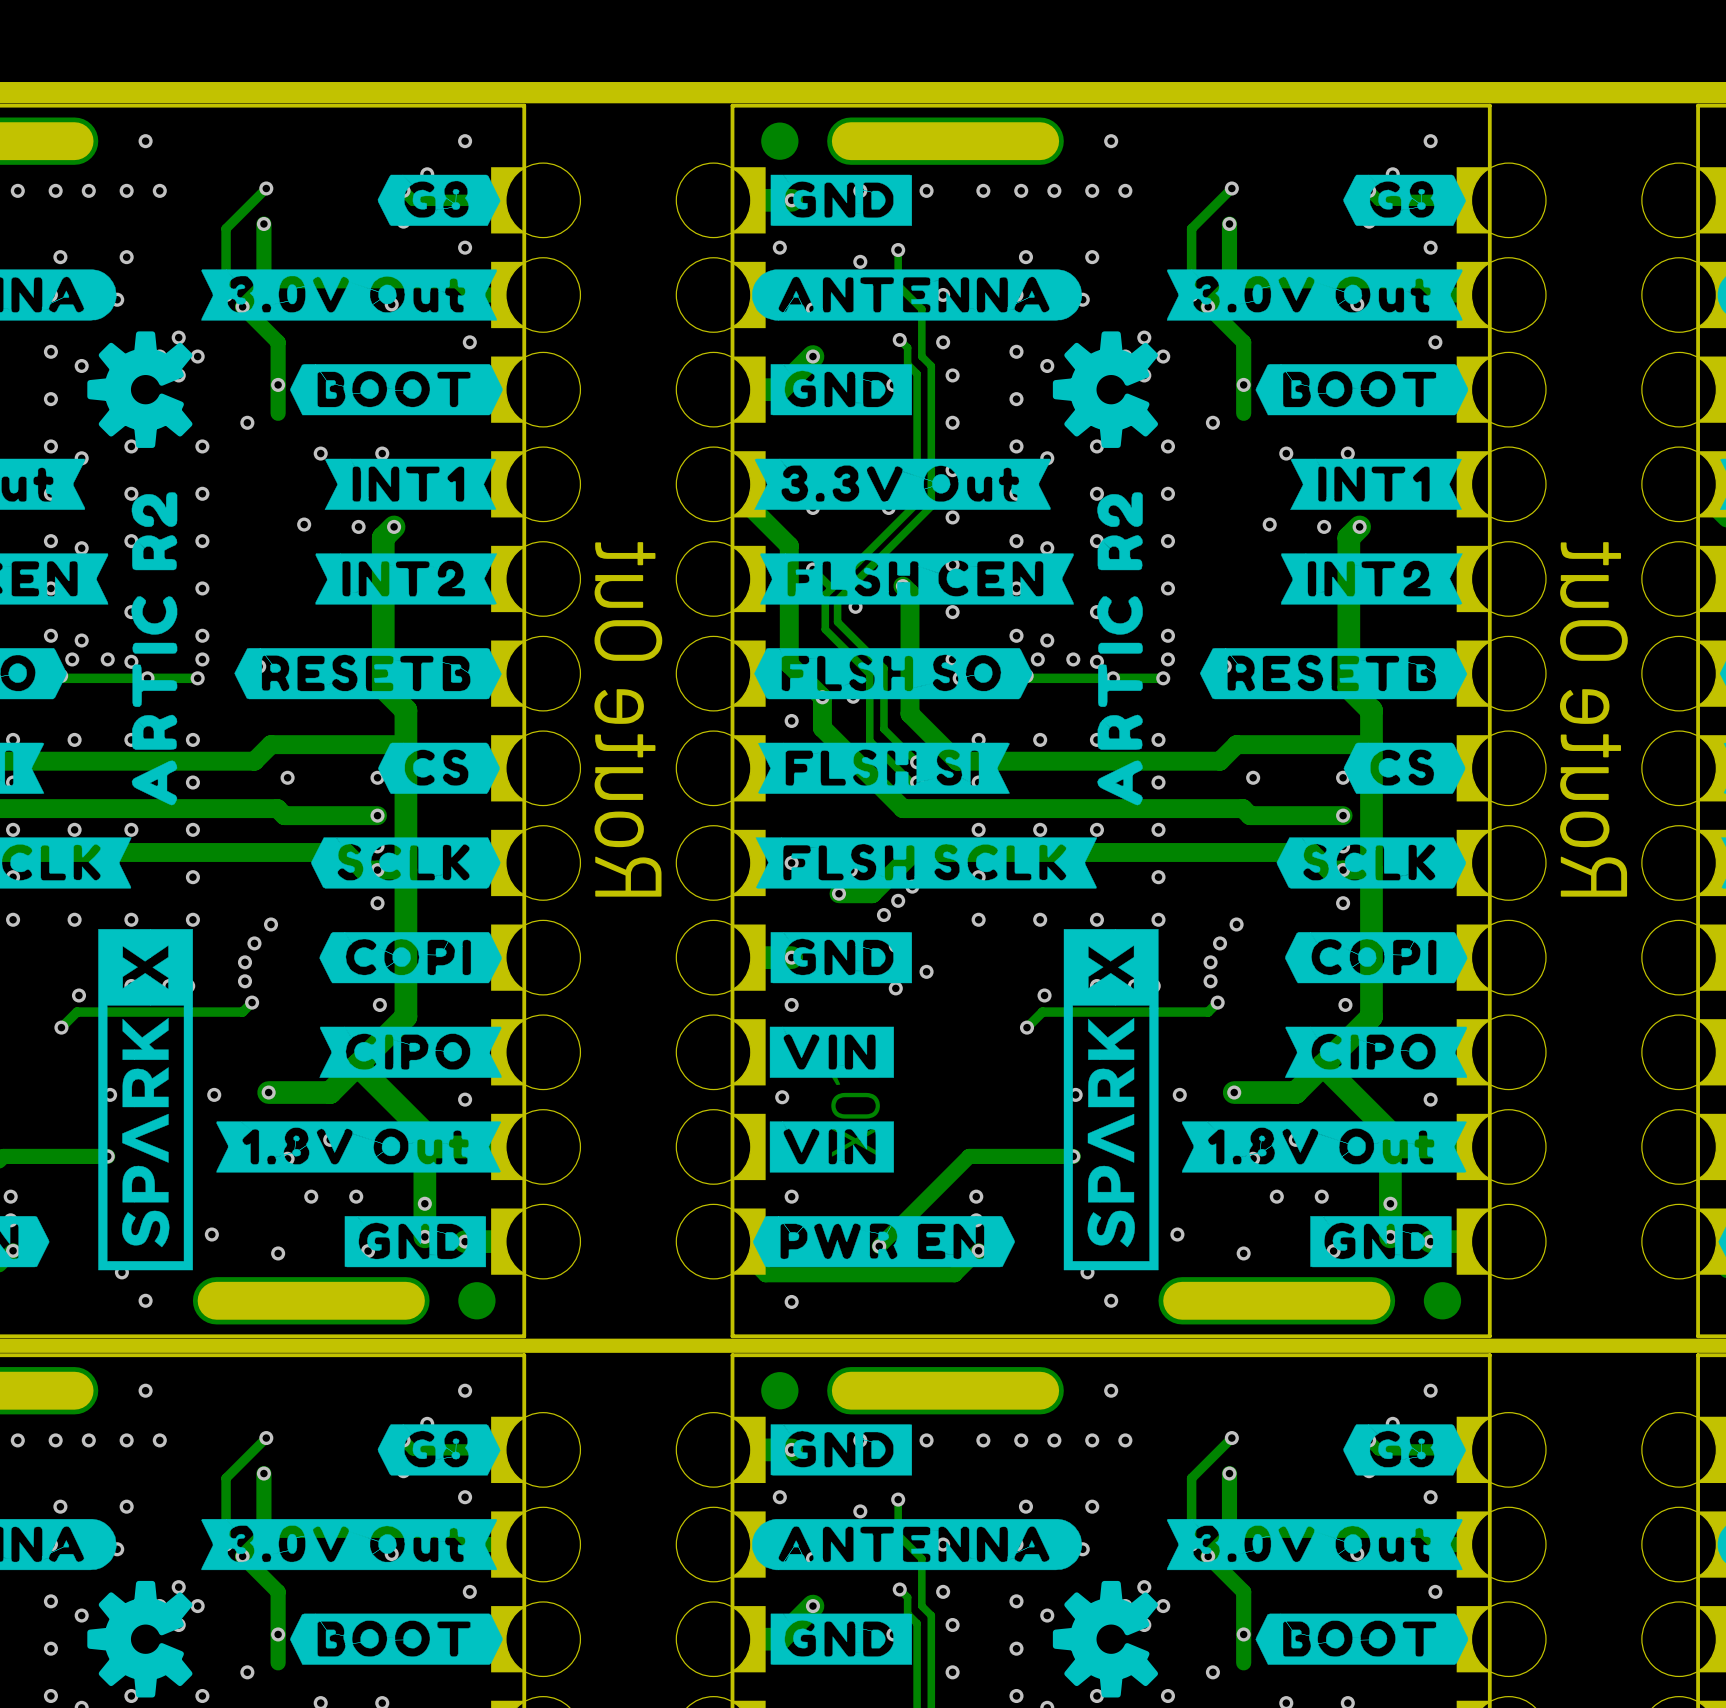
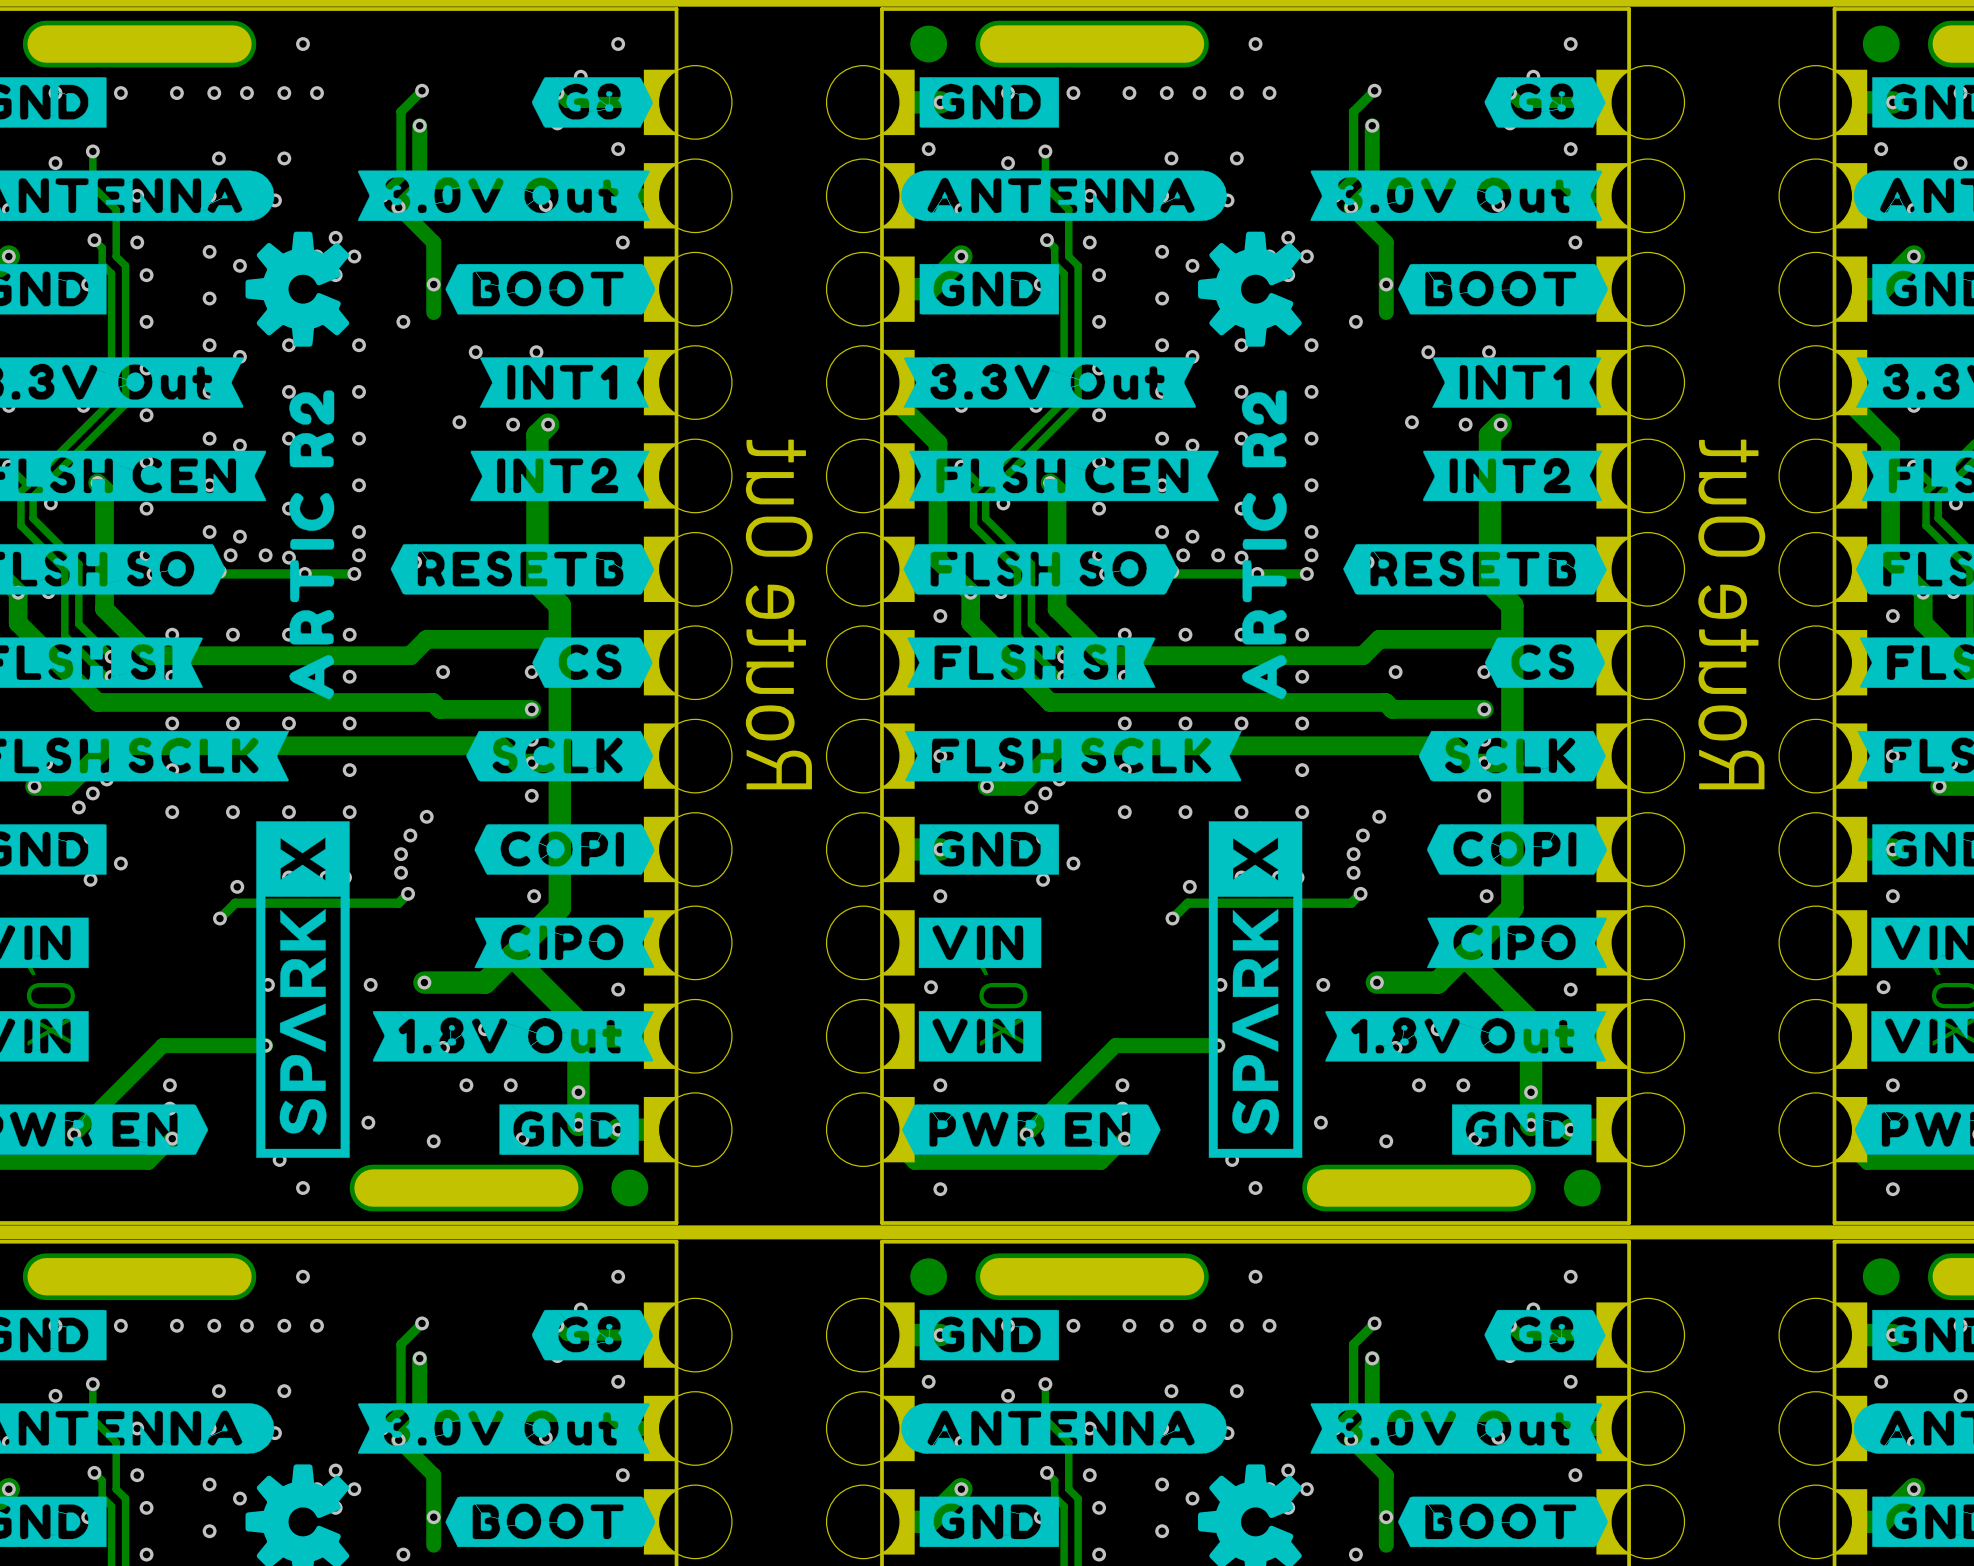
track: (244, 209) (226, 228) (226, 294) -> (401, 111) (401, 177) (382, 195)
track: (1210, 209) (1191, 228) (1191, 294) -> (1353, 111) (1353, 177) (1334, 195)
track: (244, 1459) (226, 1478) (226, 1544) -> (401, 1344) (401, 1409) (382, 1428)
track: (1210, 1459) (1191, 1478) (1191, 1544) -> (1353, 1344) (1353, 1409) (1334, 1428)

